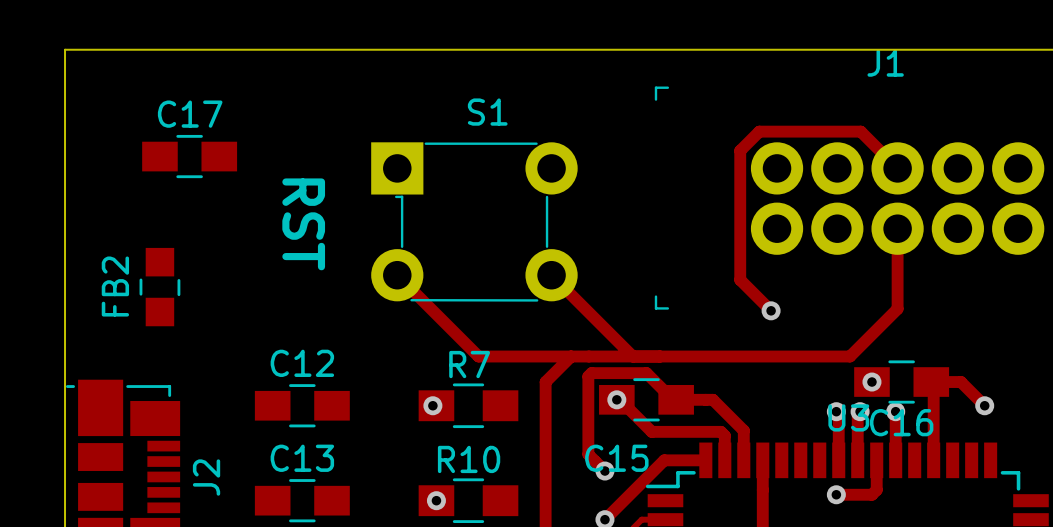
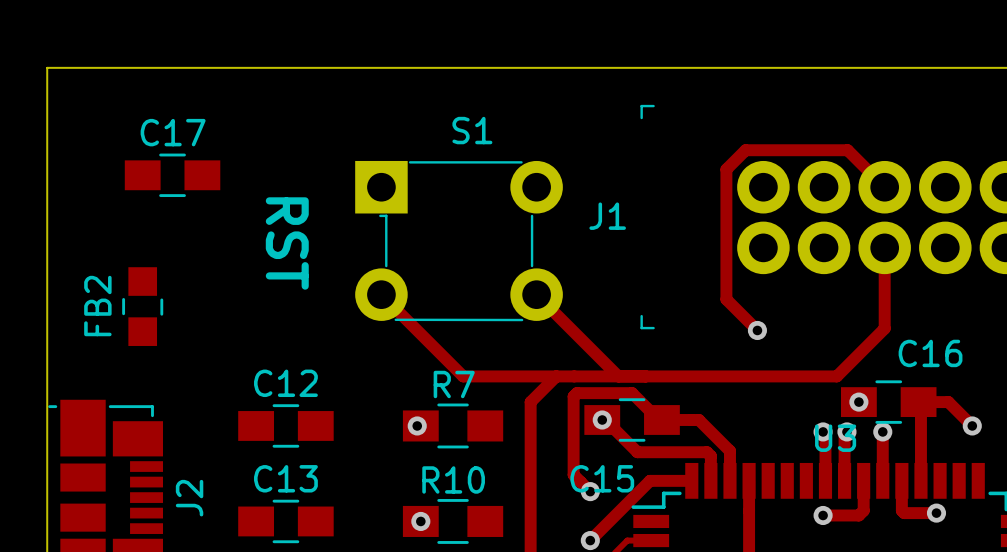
J1 name position: J1 (885, 63) -> J1 (607, 216)
C16 name position: C16 (901, 422) -> C16 (930, 353)
track: none -> (901, 480) (901, 510) (904, 513) (936, 513)
via: none -> (936, 513)

